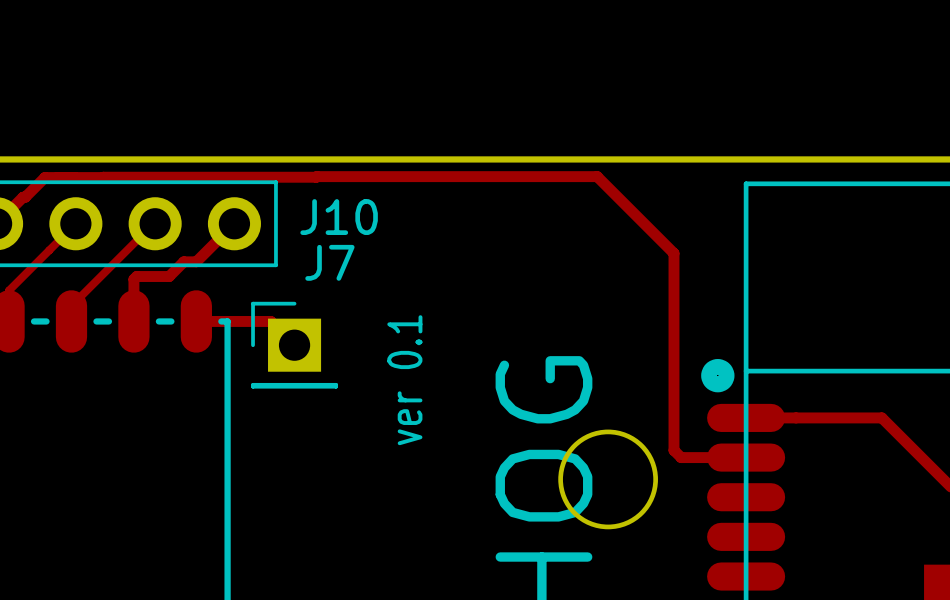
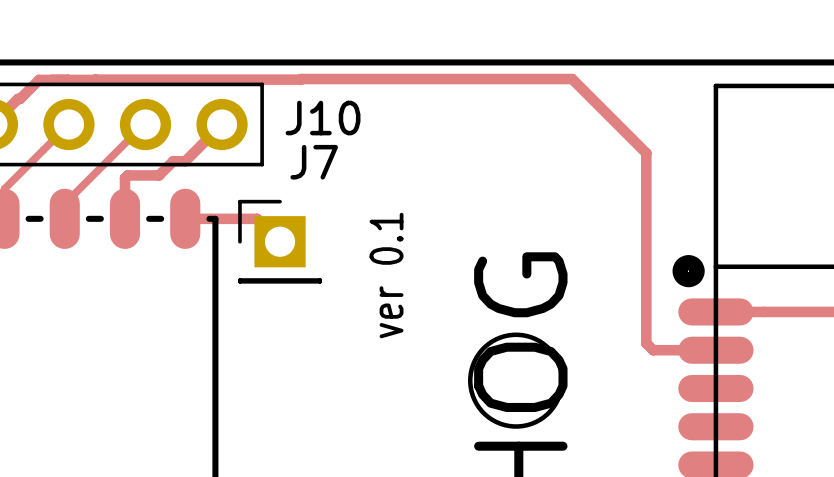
round board edge position: (608, 479) -> (516, 380)

